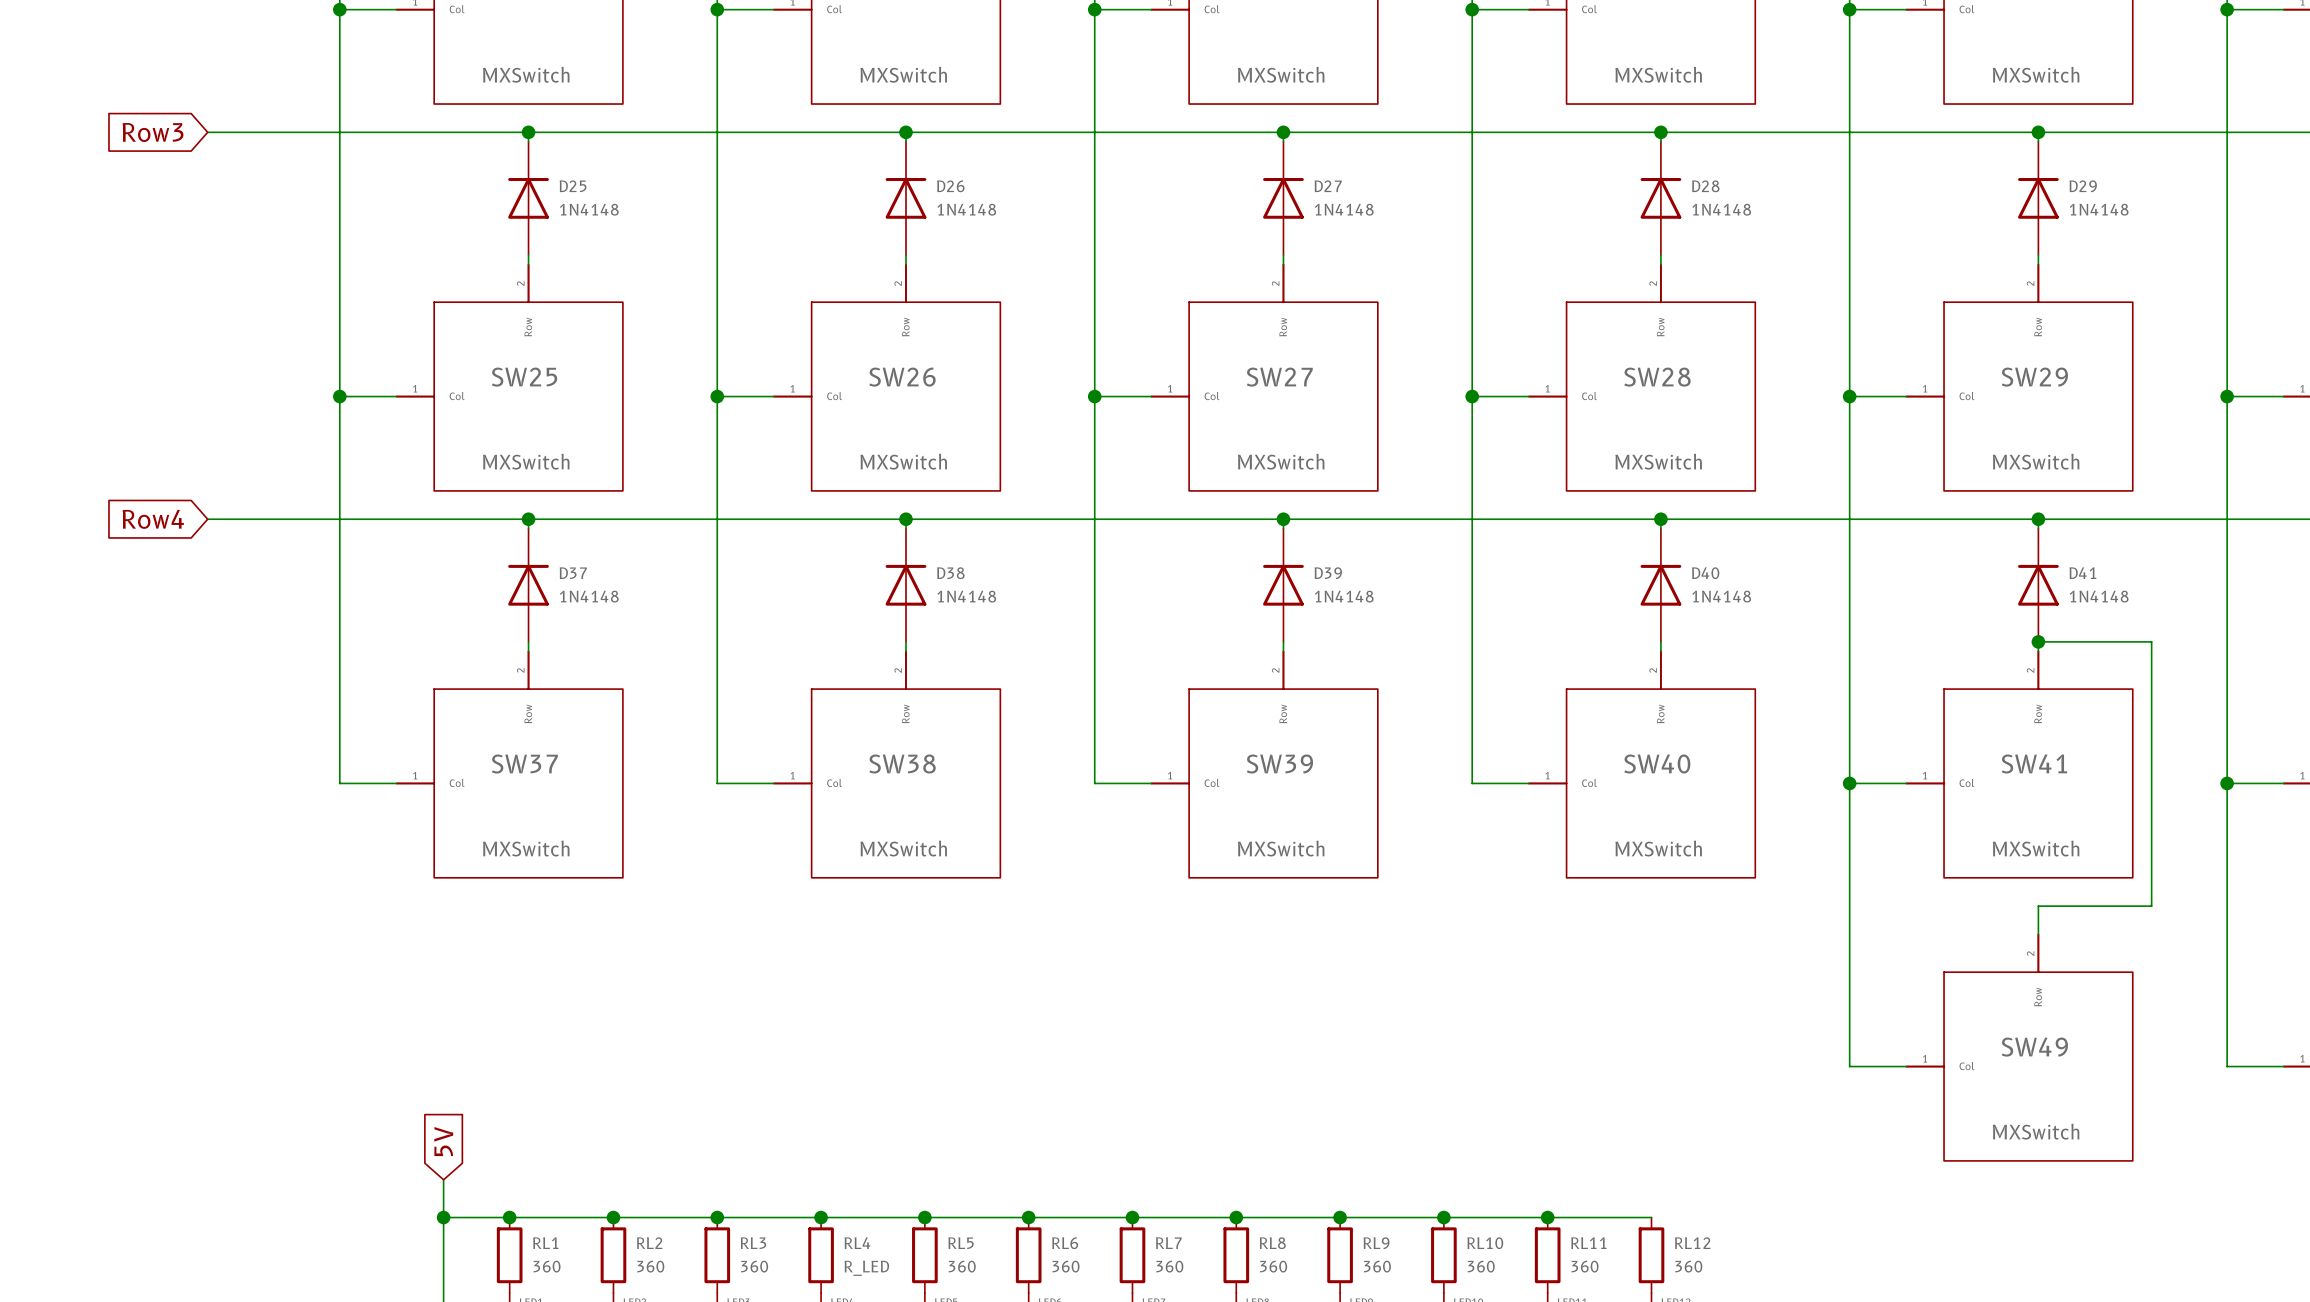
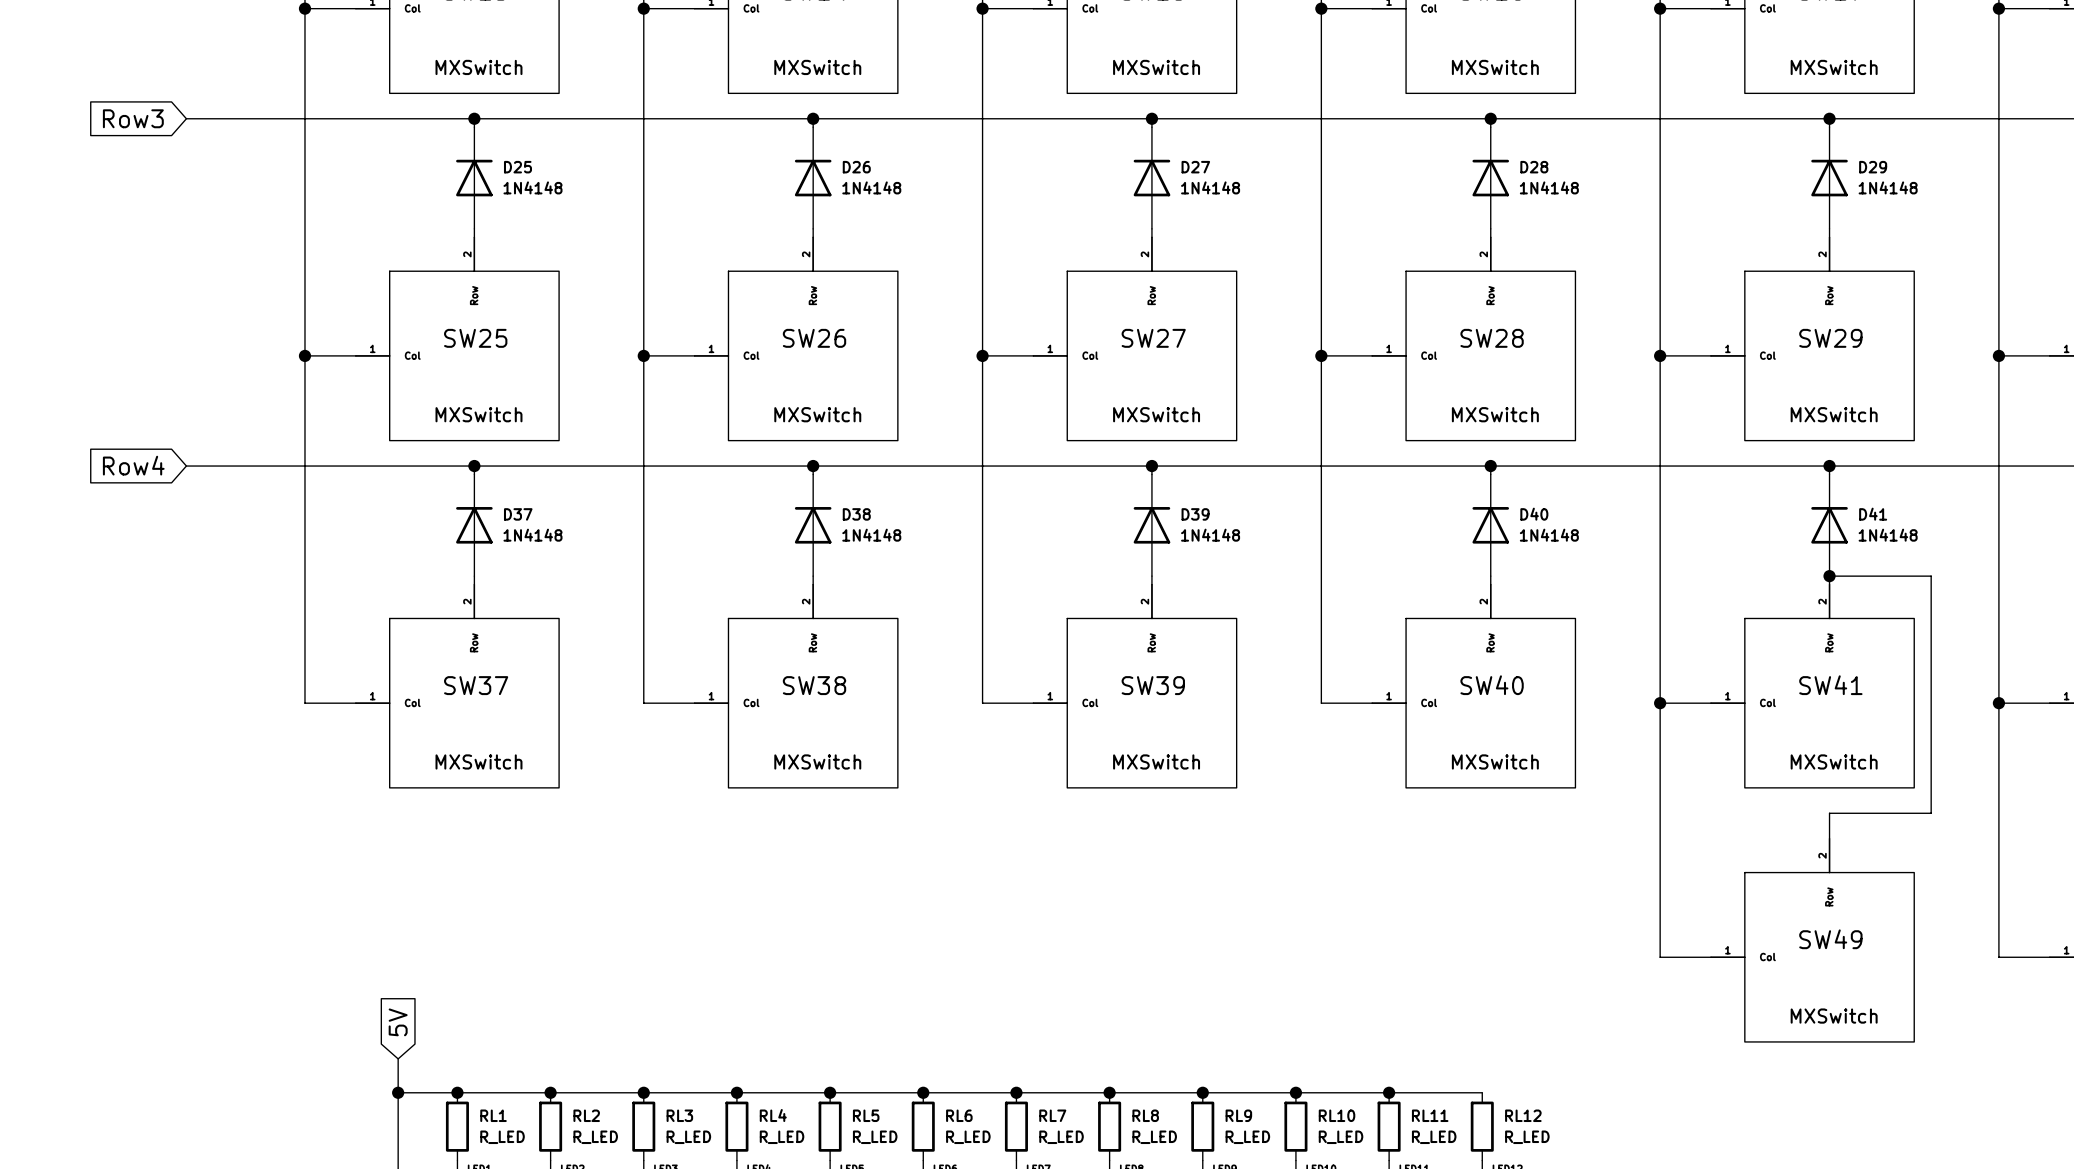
RL1 value: 360 (546, 1266) -> R_LED (502, 1137)
RL2 value: 360 (650, 1266) -> R_LED (595, 1137)
RL3 value: 360 (754, 1266) -> R_LED (688, 1137)
RL5 value: 360 (962, 1266) -> R_LED (875, 1137)
RL6 value: 360 (1066, 1266) -> R_LED (968, 1137)
RL7 value: 360 (1169, 1266) -> R_LED (1061, 1137)
RL8 value: 360 (1273, 1266) -> R_LED (1154, 1137)
RL9 value: 360 (1377, 1266) -> R_LED (1247, 1137)
RL10 value: 360 (1481, 1266) -> R_LED (1341, 1137)
RL11 value: 360 (1585, 1266) -> R_LED (1434, 1137)
RL12 value: 360 (1688, 1266) -> R_LED (1527, 1137)

